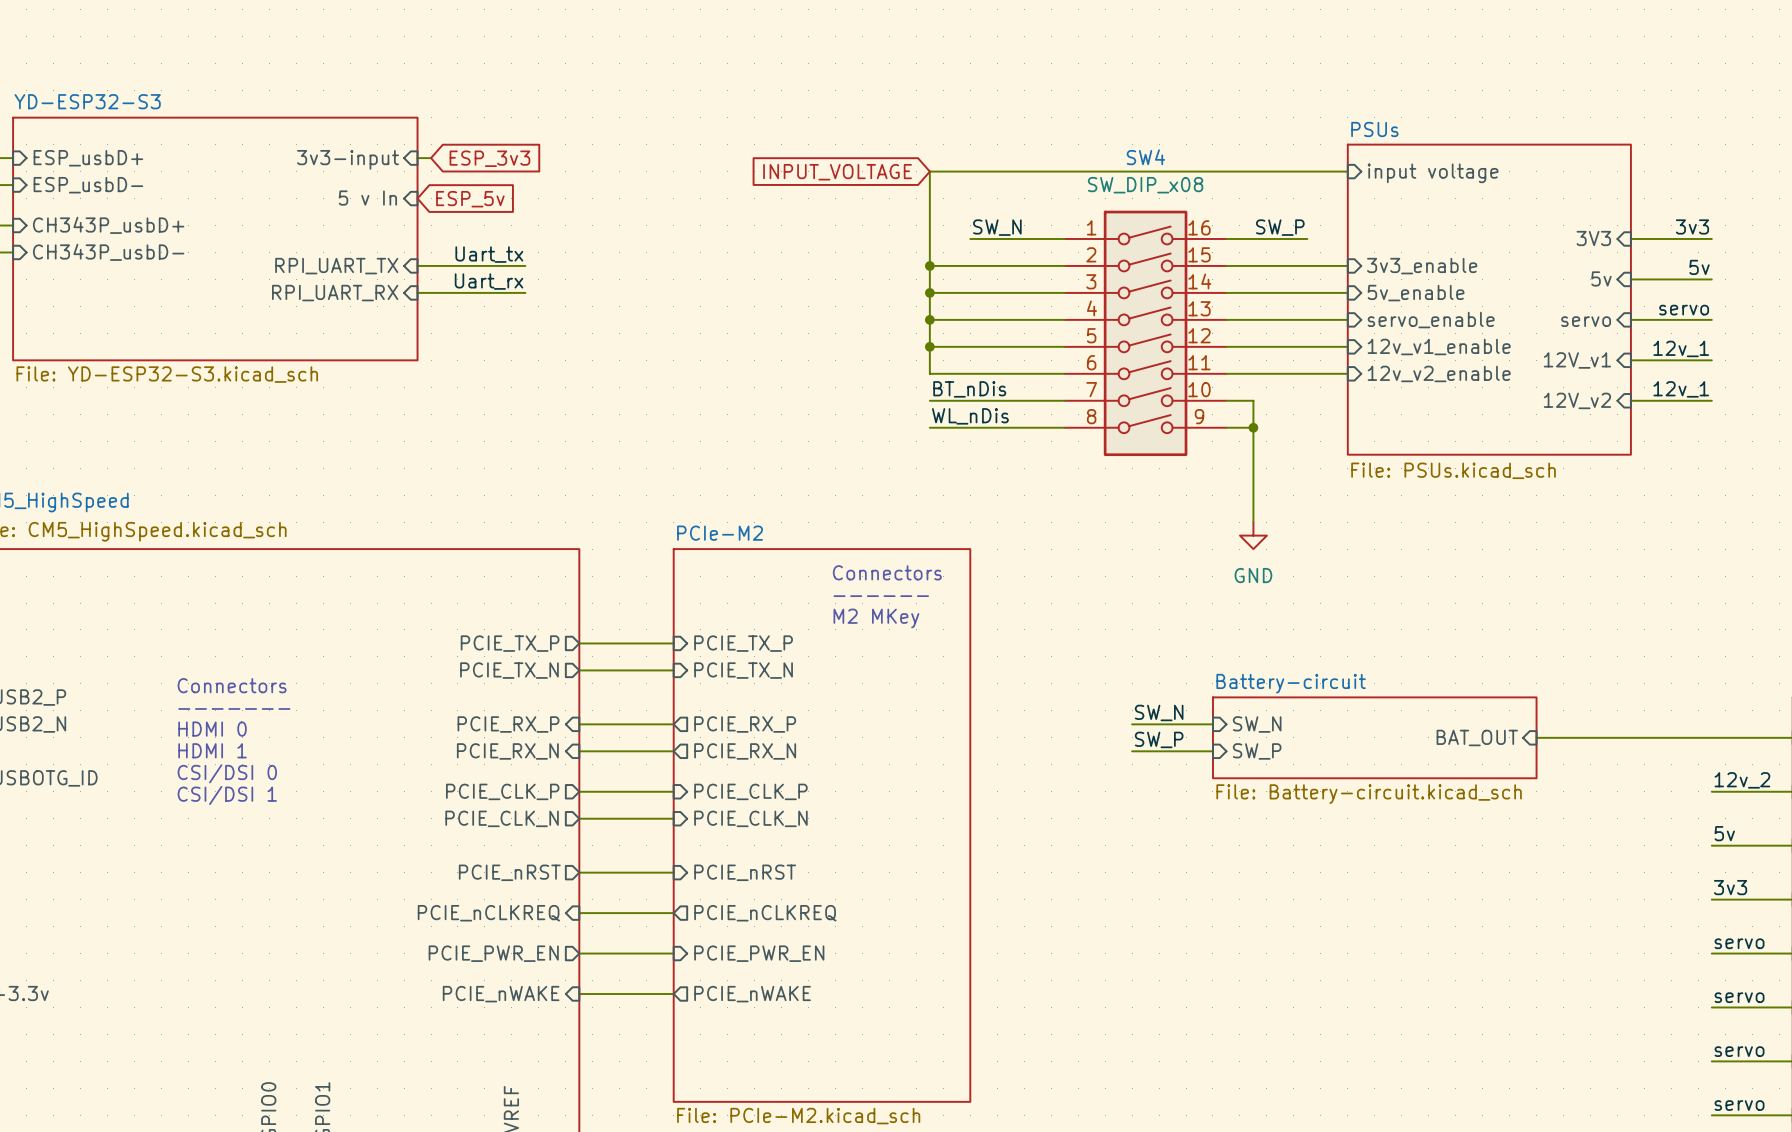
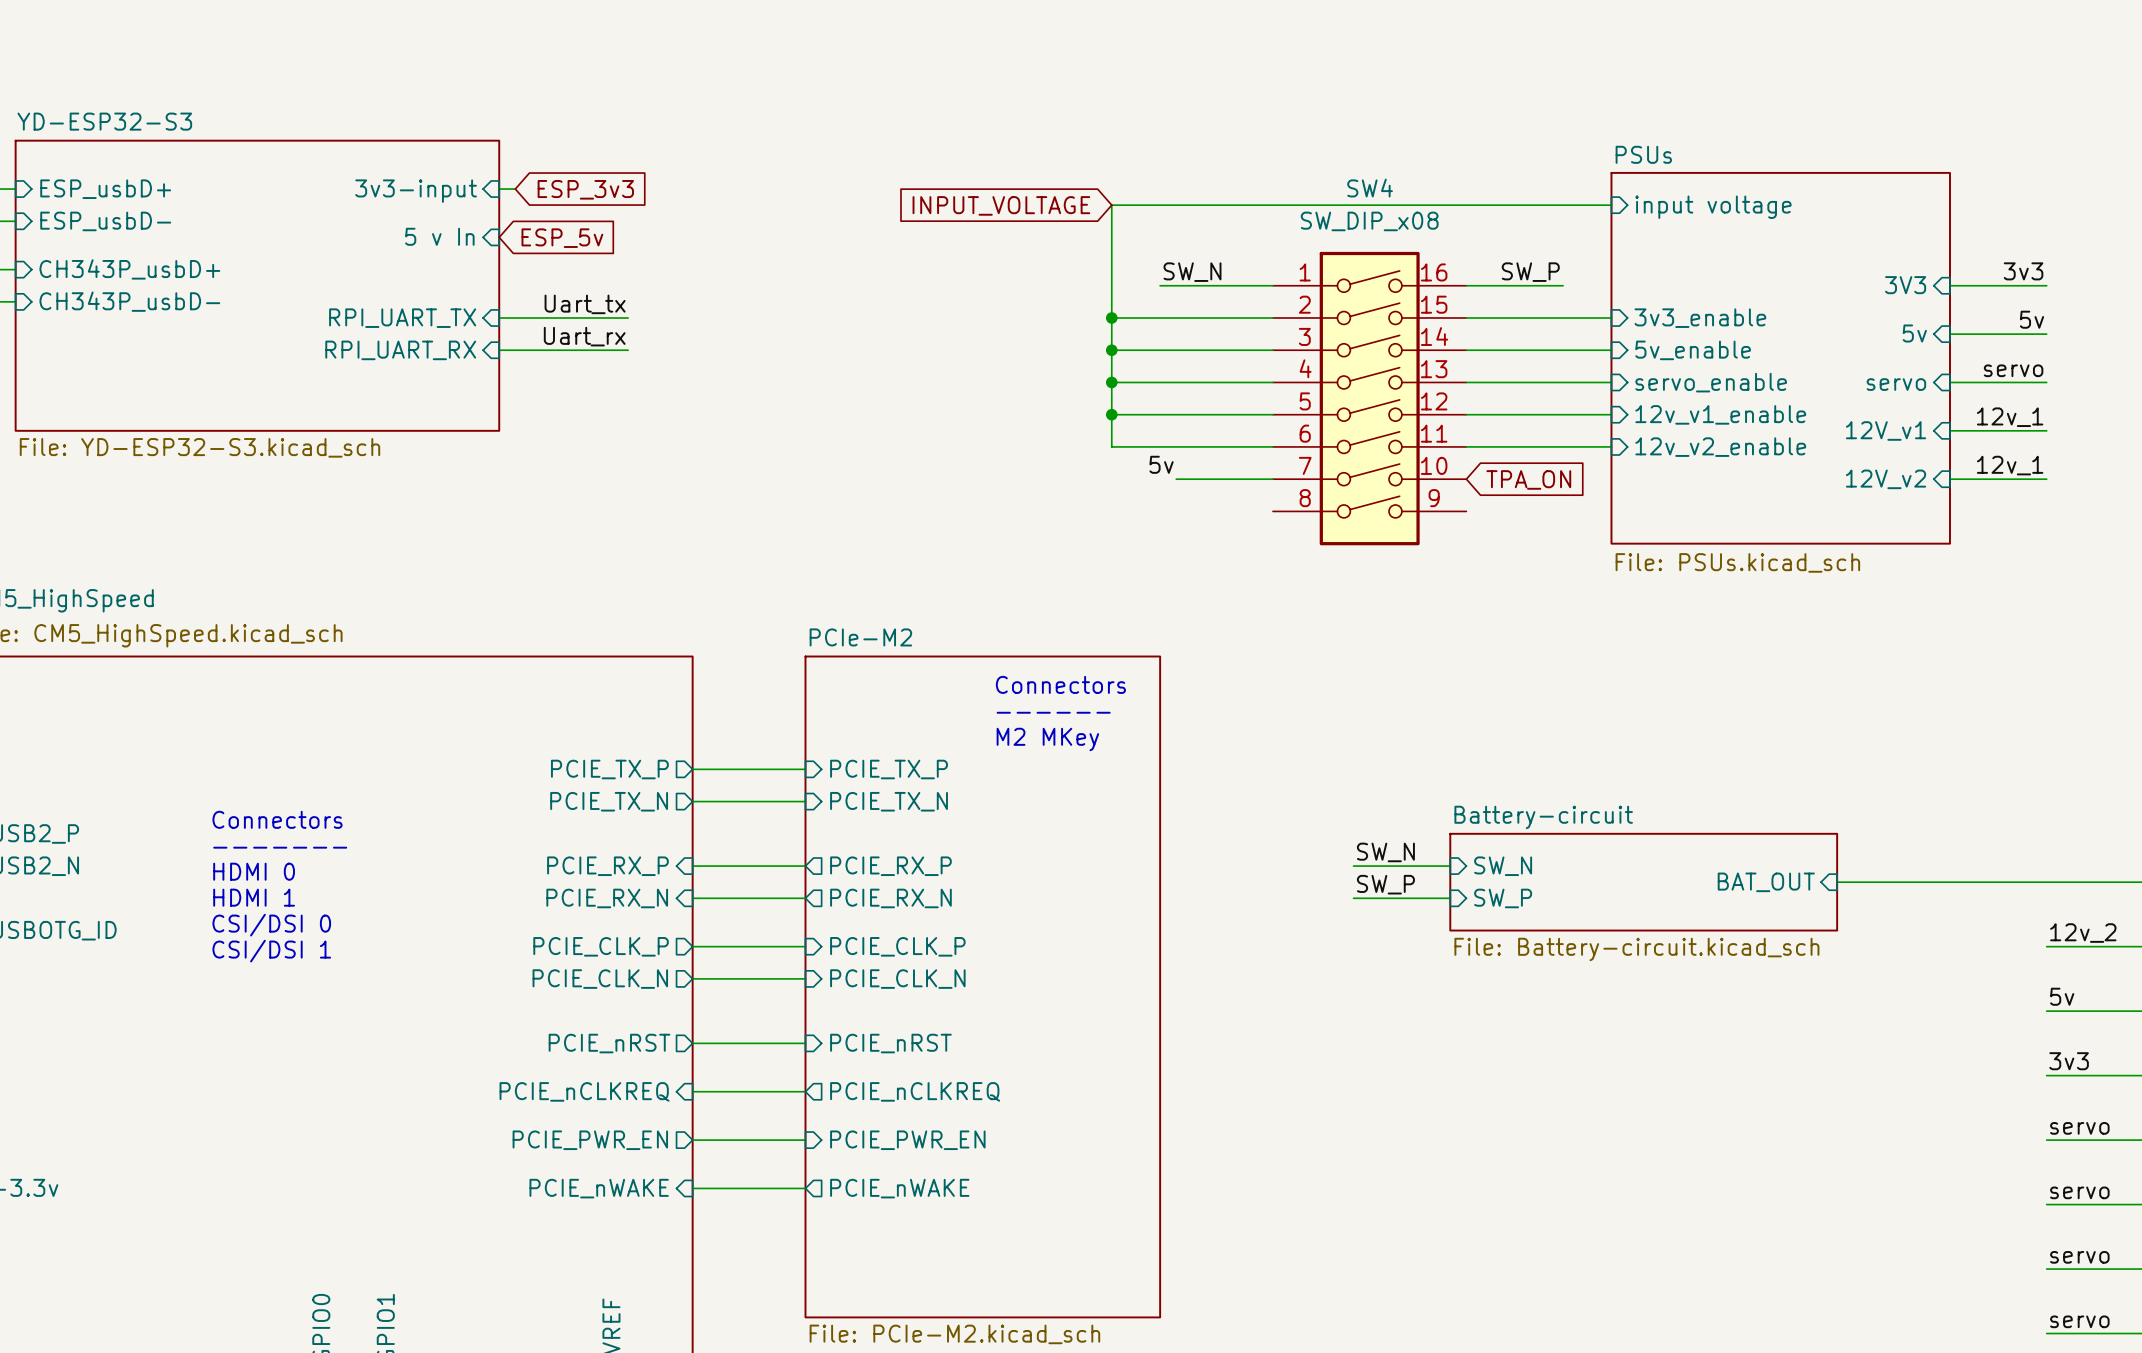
label: none -> 5v (1161, 464)
label: BT_nDis (969, 389) -> none
wire: (929, 400) (983, 400) -> none
wire: (1226, 400) (1253, 400) (1253, 522) -> none
global label: none -> TPA_ON (1528, 479)
label: WL_nDis (970, 416) -> none
wire: (929, 427) (1064, 427) -> none
wire: (1226, 427) (1253, 427) -> none
junction: (1253, 427) -> none
power symbol: GND (1253, 535) -> none

